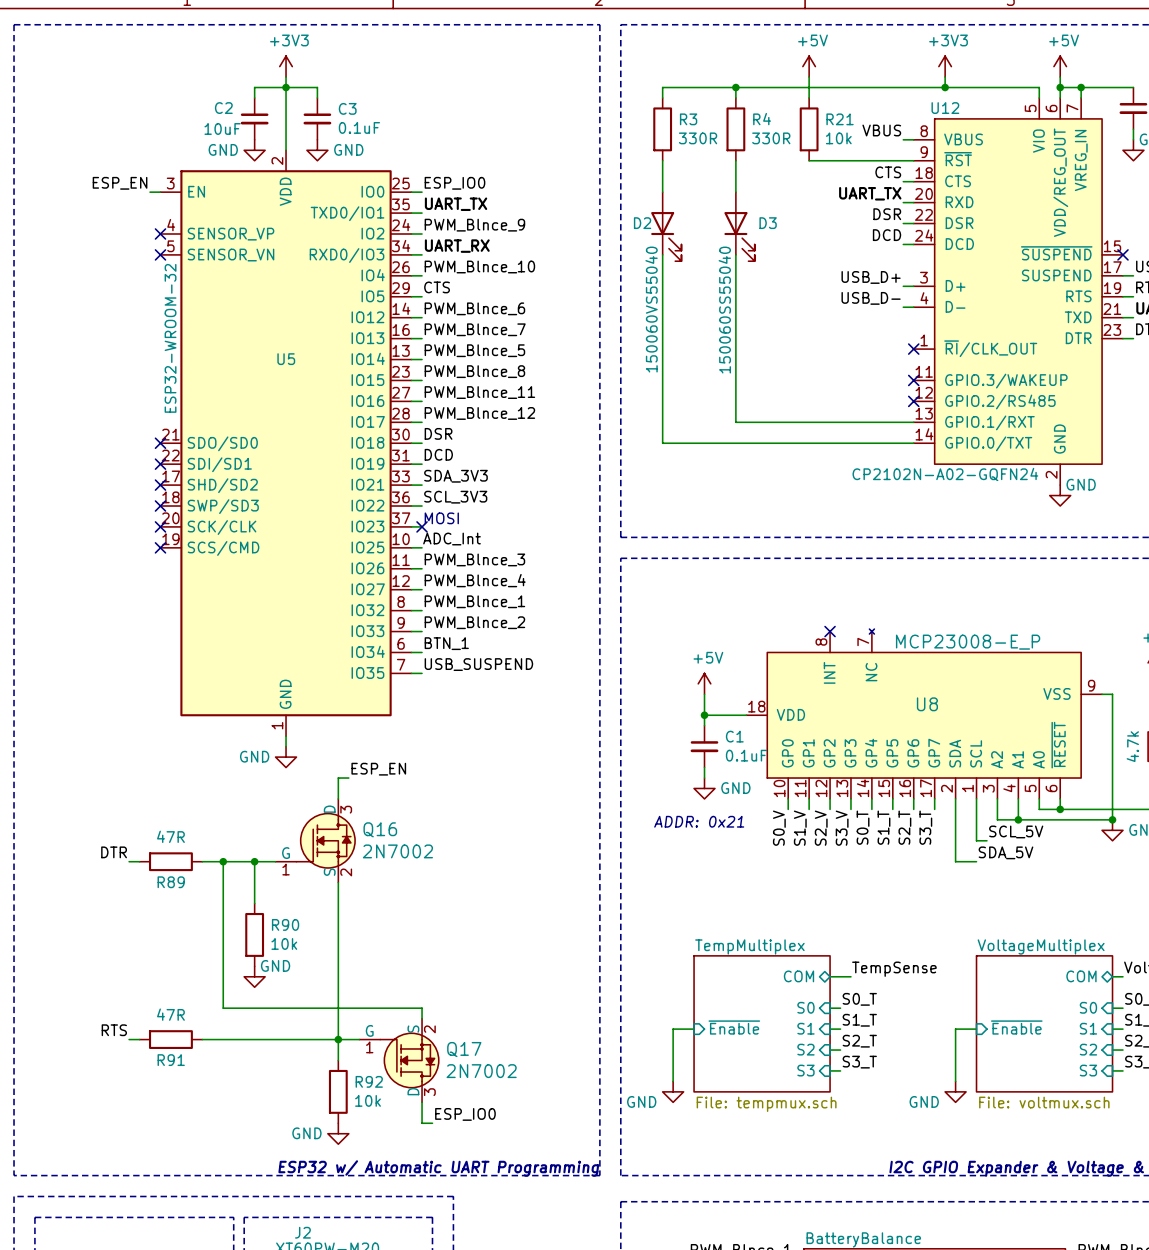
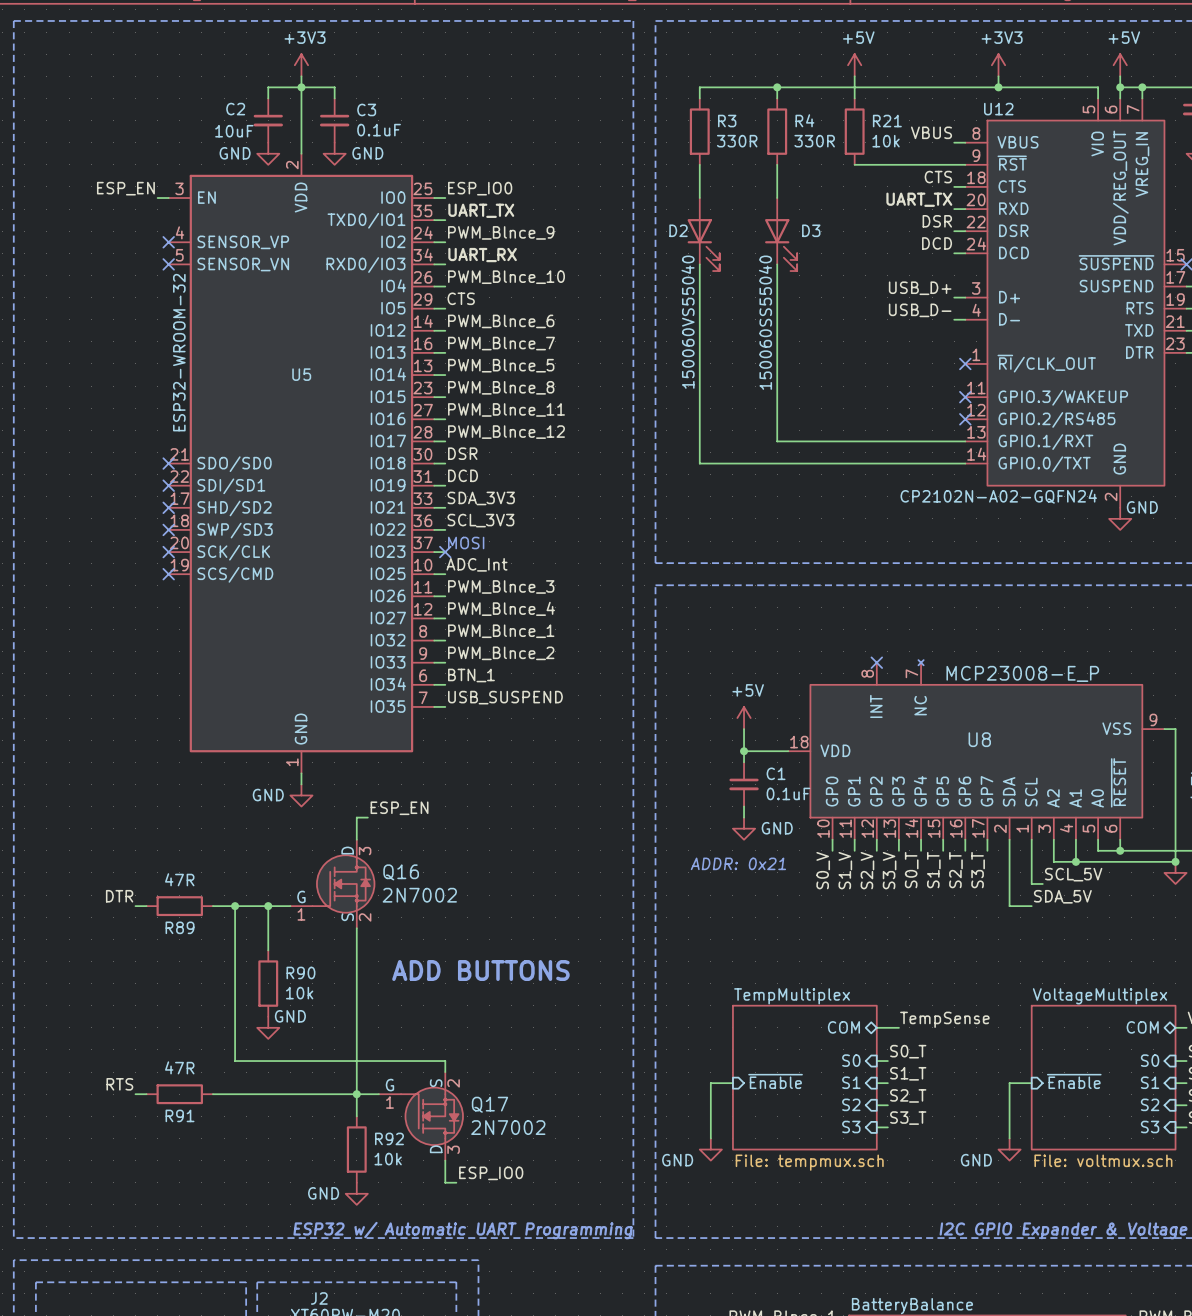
text: none -> ADD BUTTONS (480, 970)

